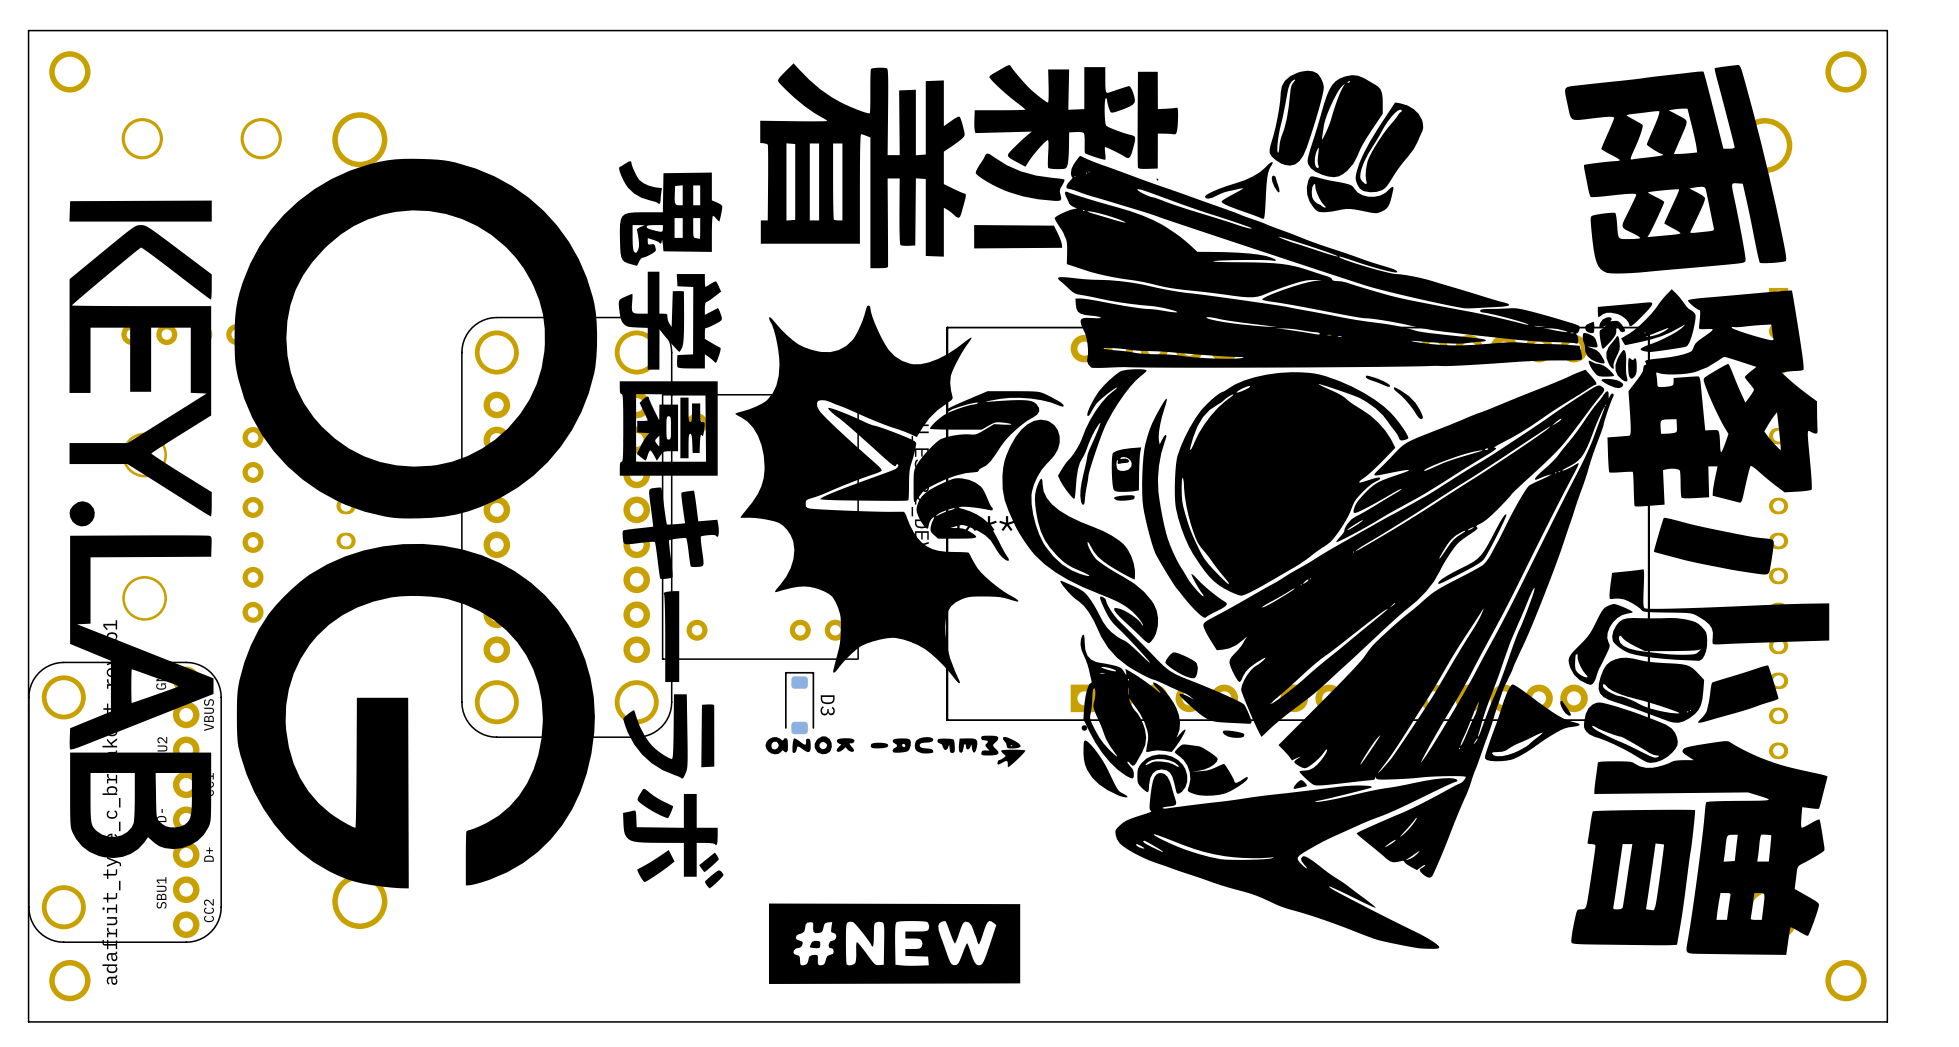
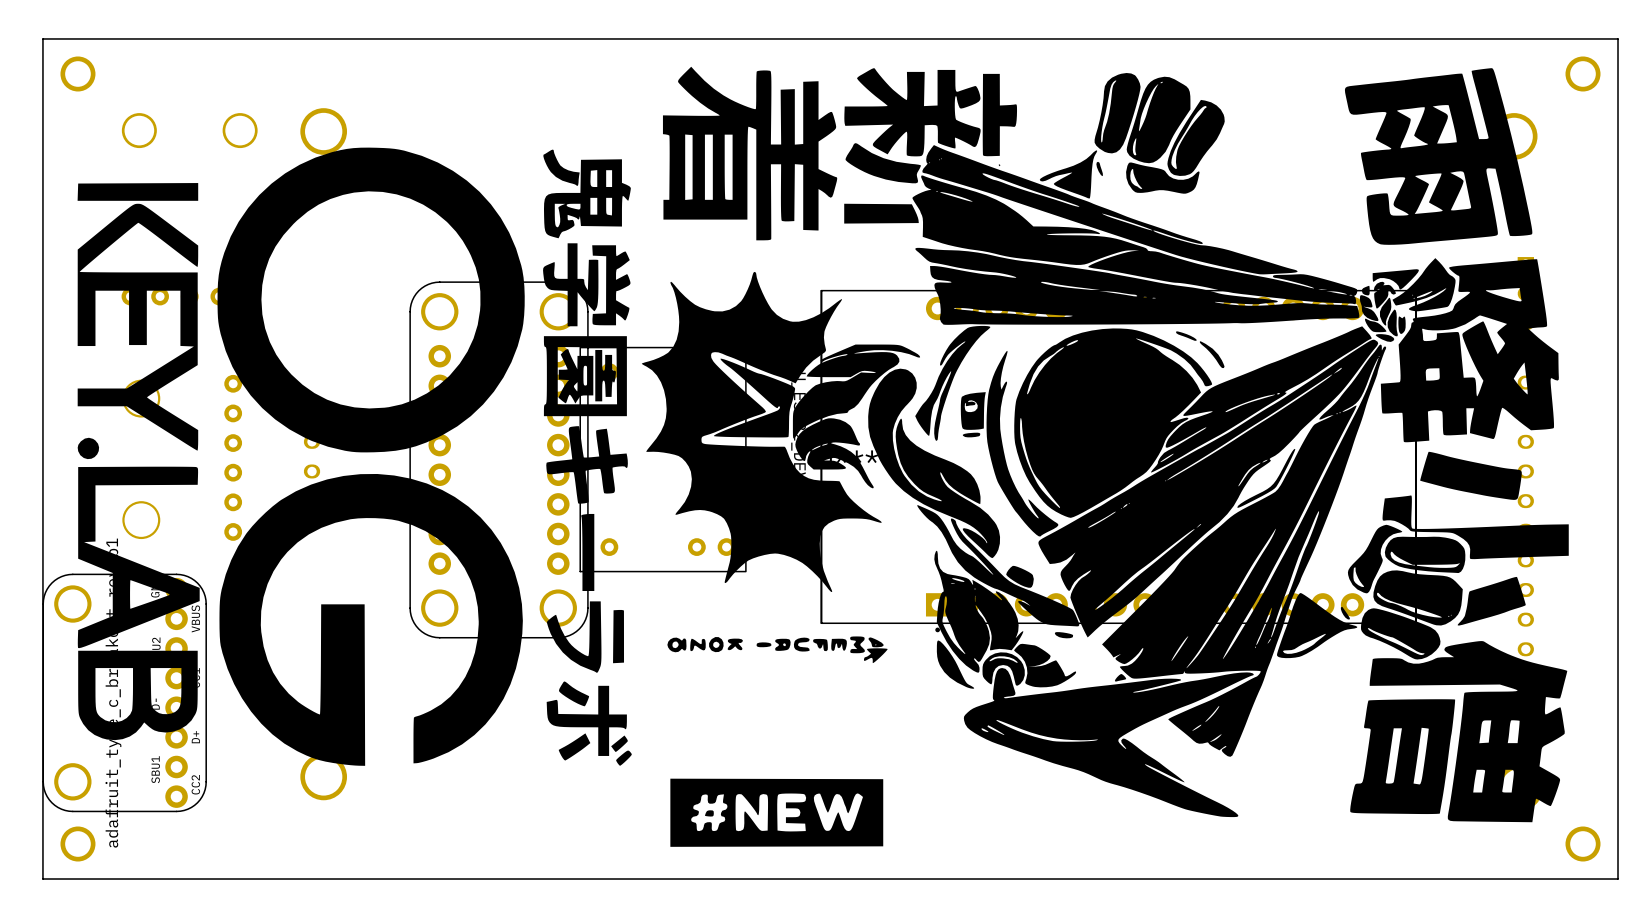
D3: (799, 703) -> none

